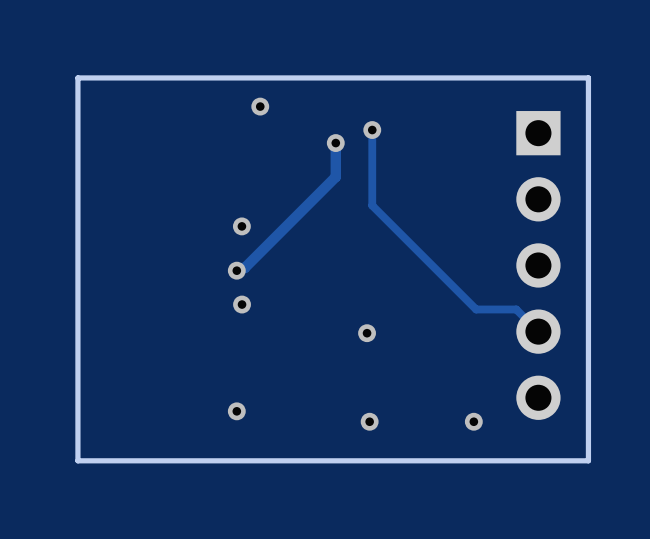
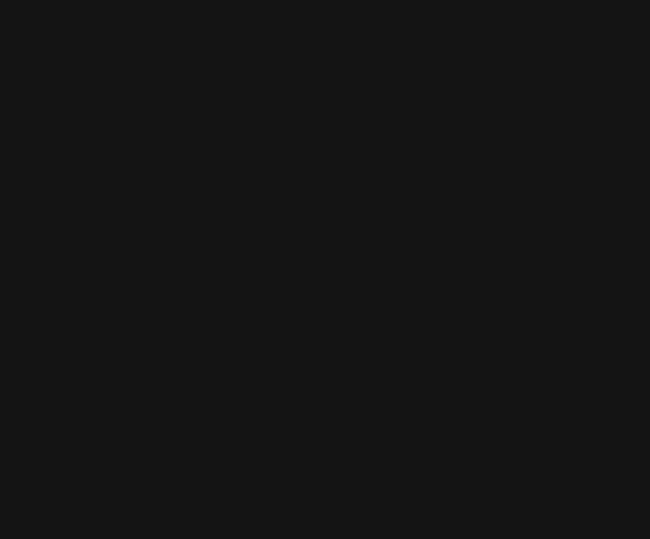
board edge: (588, 77) (588, 460) (77, 460) (77, 77) (588, 77) -> none
via: (260, 106) -> none
track: (372, 130) (372, 205) (476, 309) (516, 309) (538, 331) -> none
via: (372, 130) -> none
track: (335, 143) (335, 176) (244, 268) (239, 268) (236, 270) -> none
via: (335, 143) -> none
via: (241, 226) -> none
part: (538, 265) -> none
via: (236, 270) -> none
via: (242, 304) -> none
via: (367, 333) -> none
via: (236, 411) -> none
via: (369, 421) -> none
via: (473, 421) -> none

